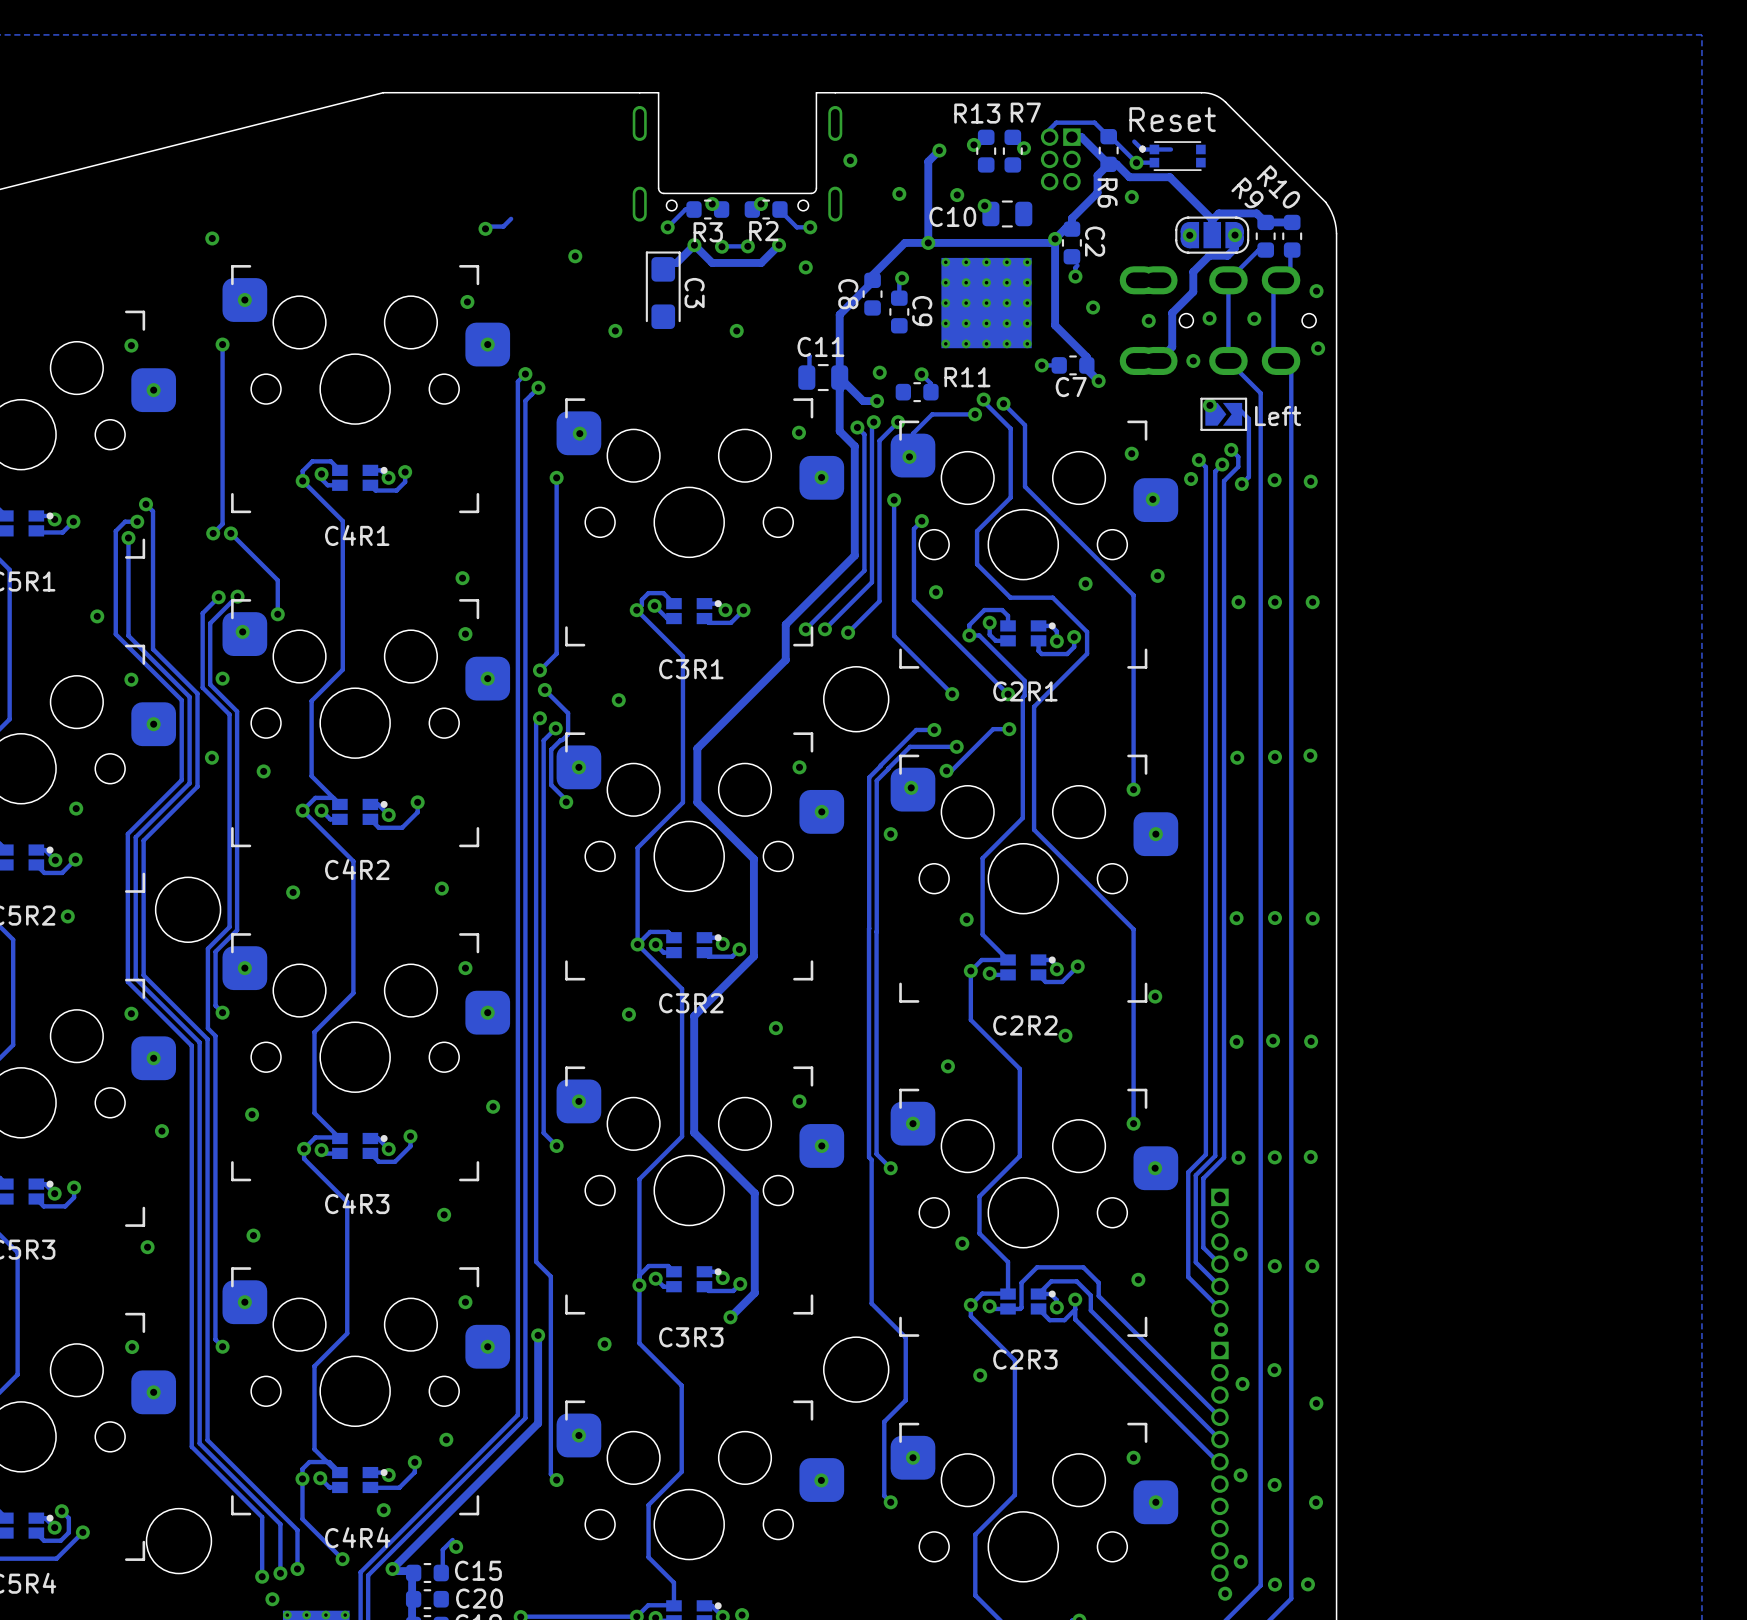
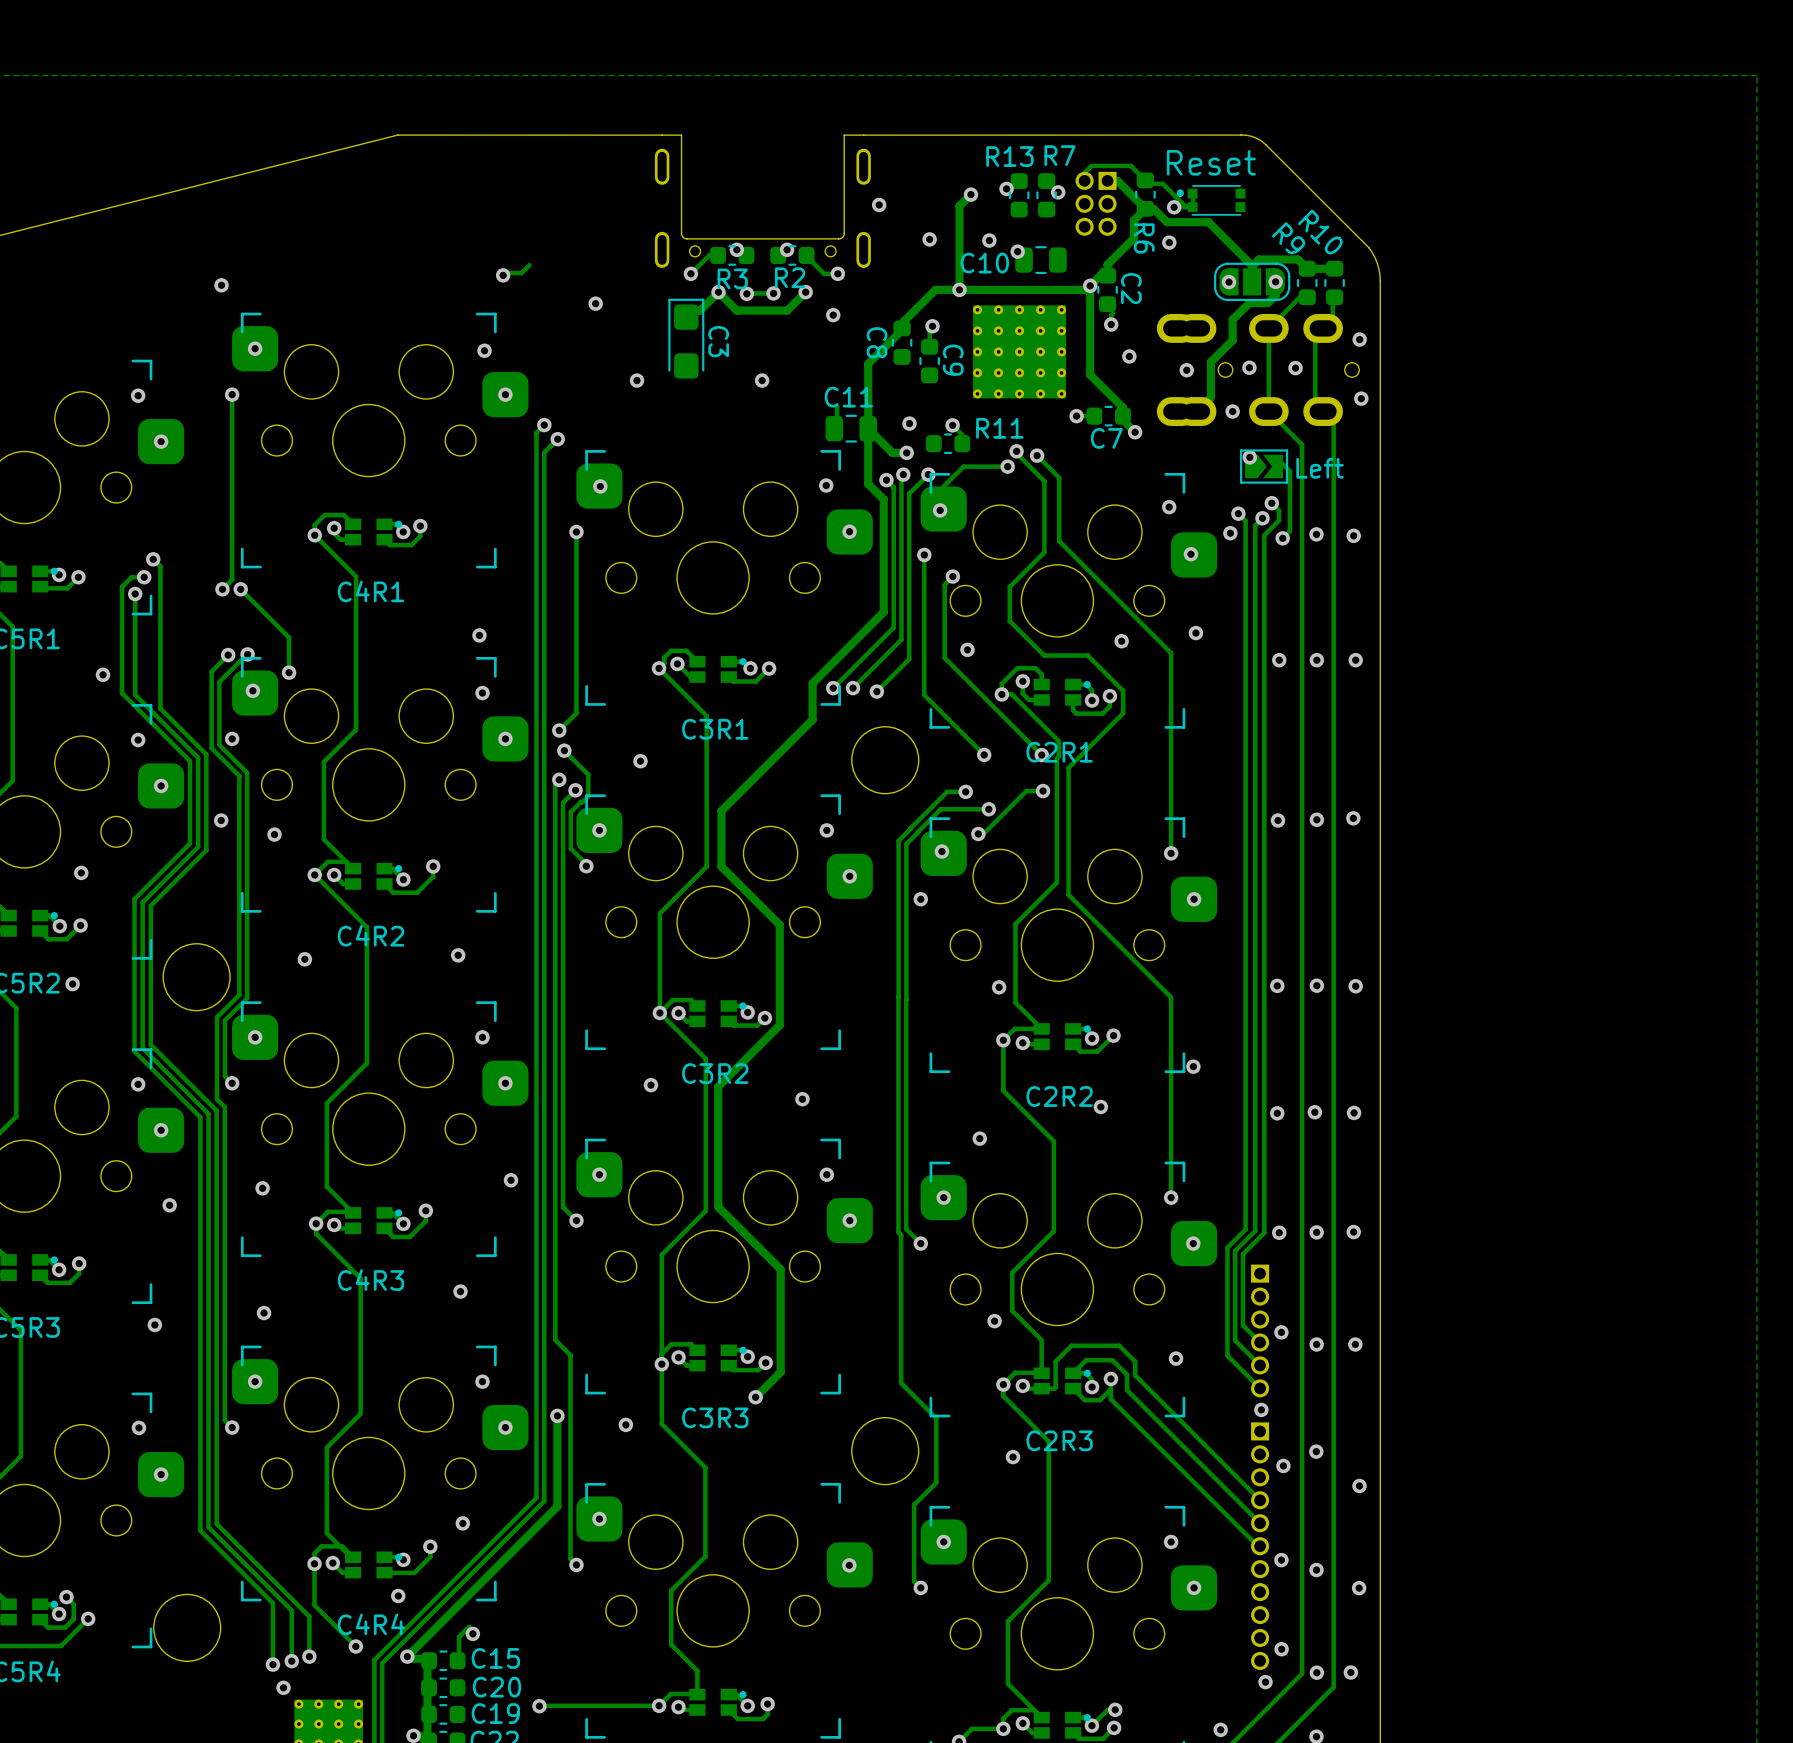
track: (1113, 140) (1136, 162) -> (1150, 183) (1162, 183) (1185, 206) (1193, 206) (1193, 192)
track: (1134, 141) (1142, 149) (1170, 149) -> none

